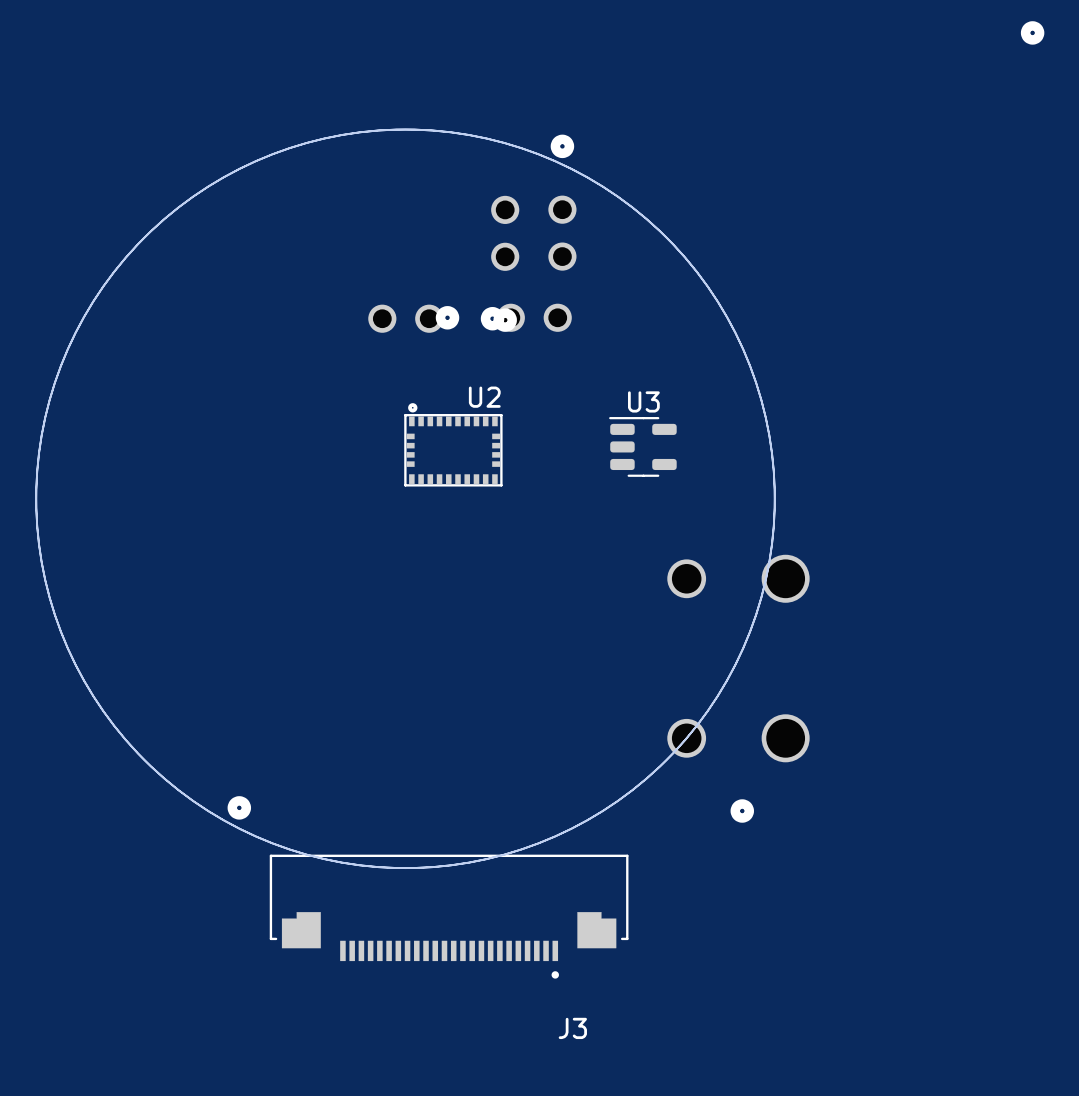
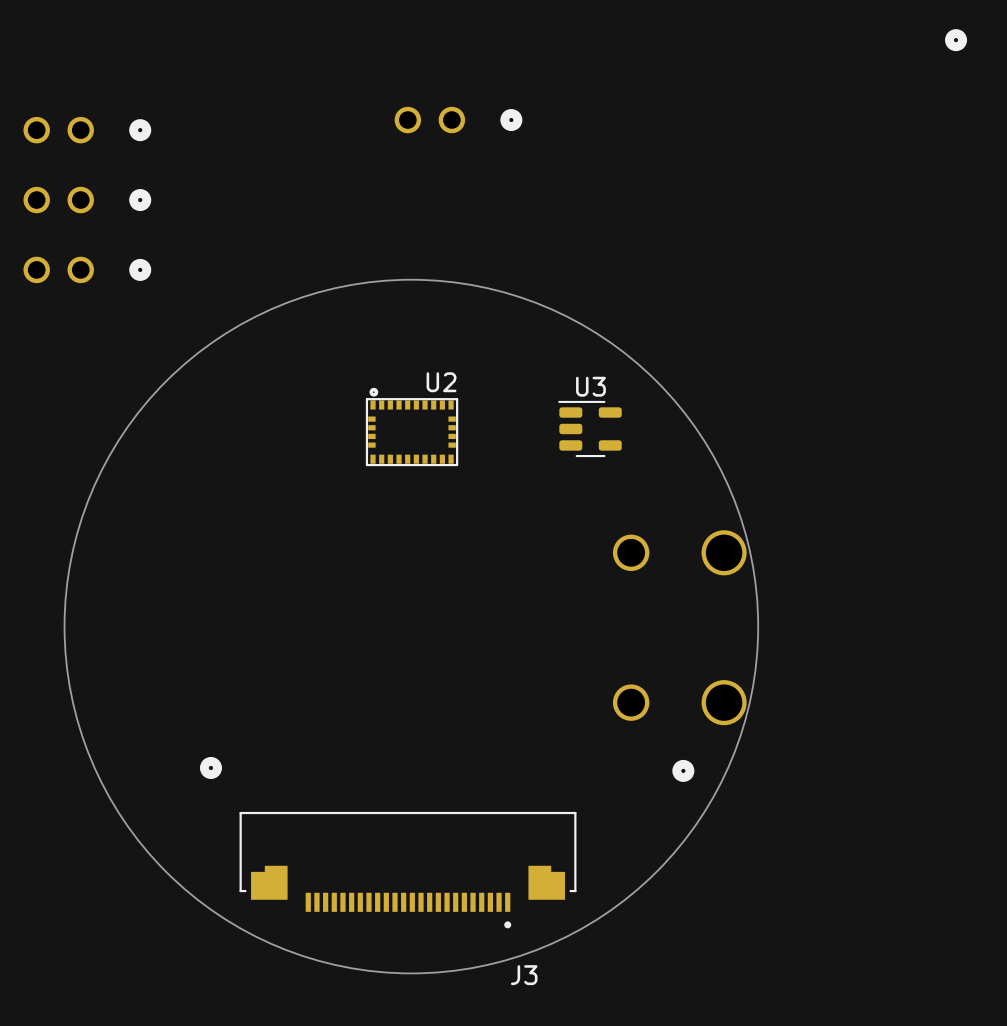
part: none -> (458, 120)
part: none -> (87, 130)
part: (562, 202) -> none
part: none -> (87, 200)
part: (505, 263) -> none
part: none -> (87, 269)
part: (503, 317) -> none
part: (436, 318) -> none
round board edge position: (405, 498) -> (411, 626)

